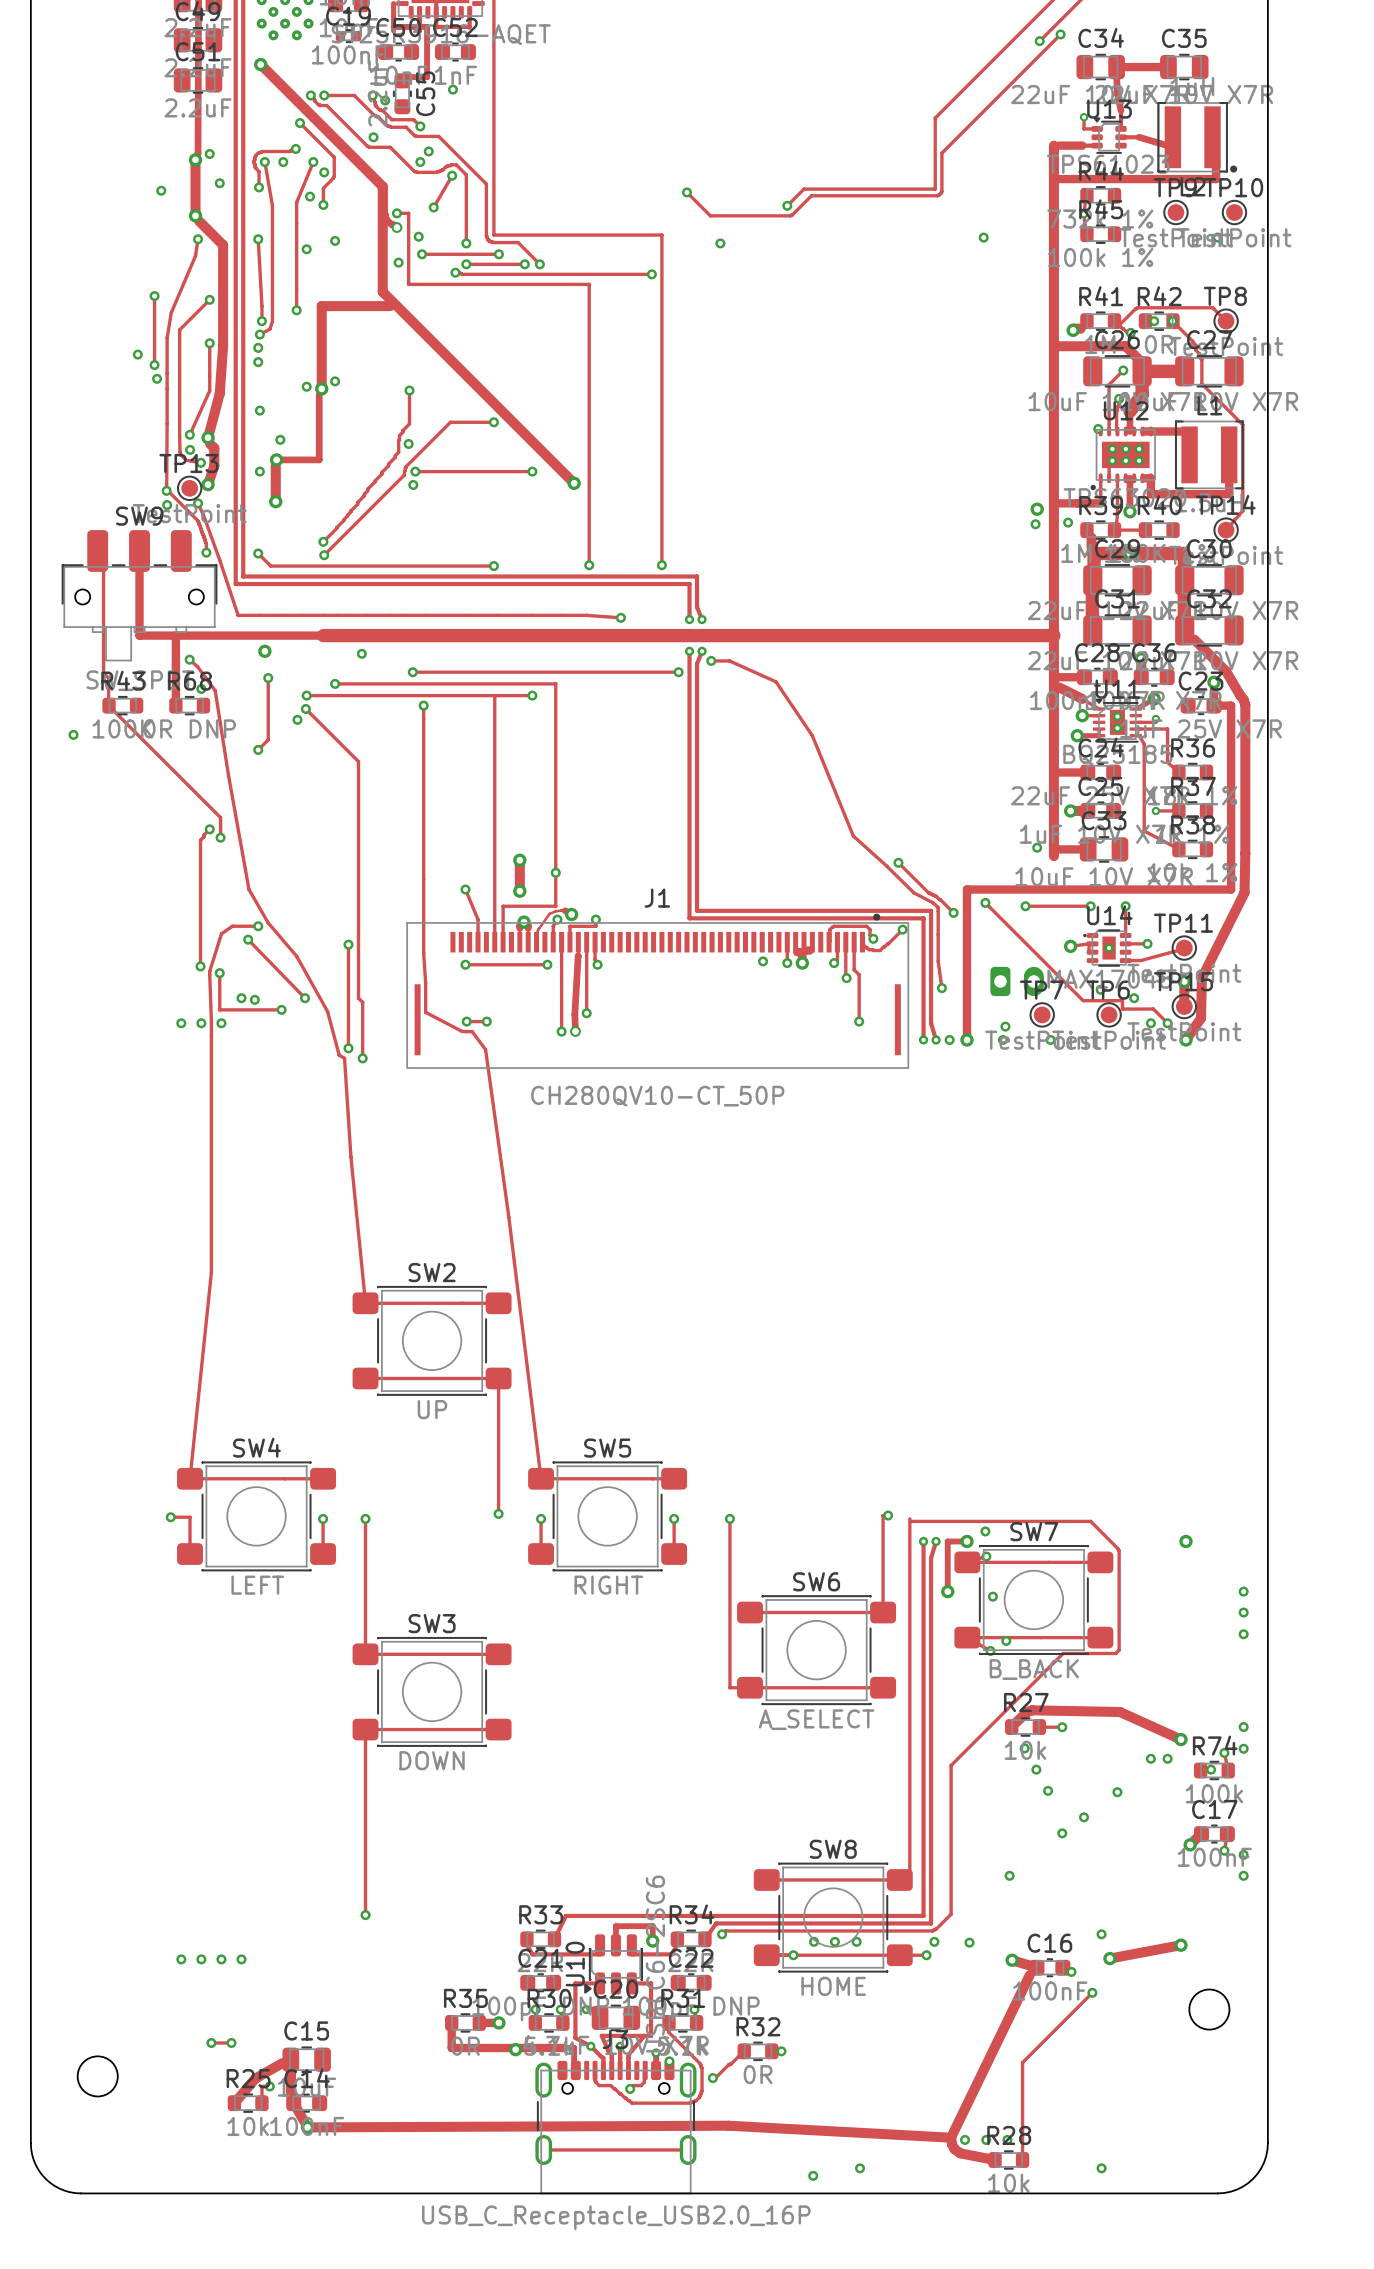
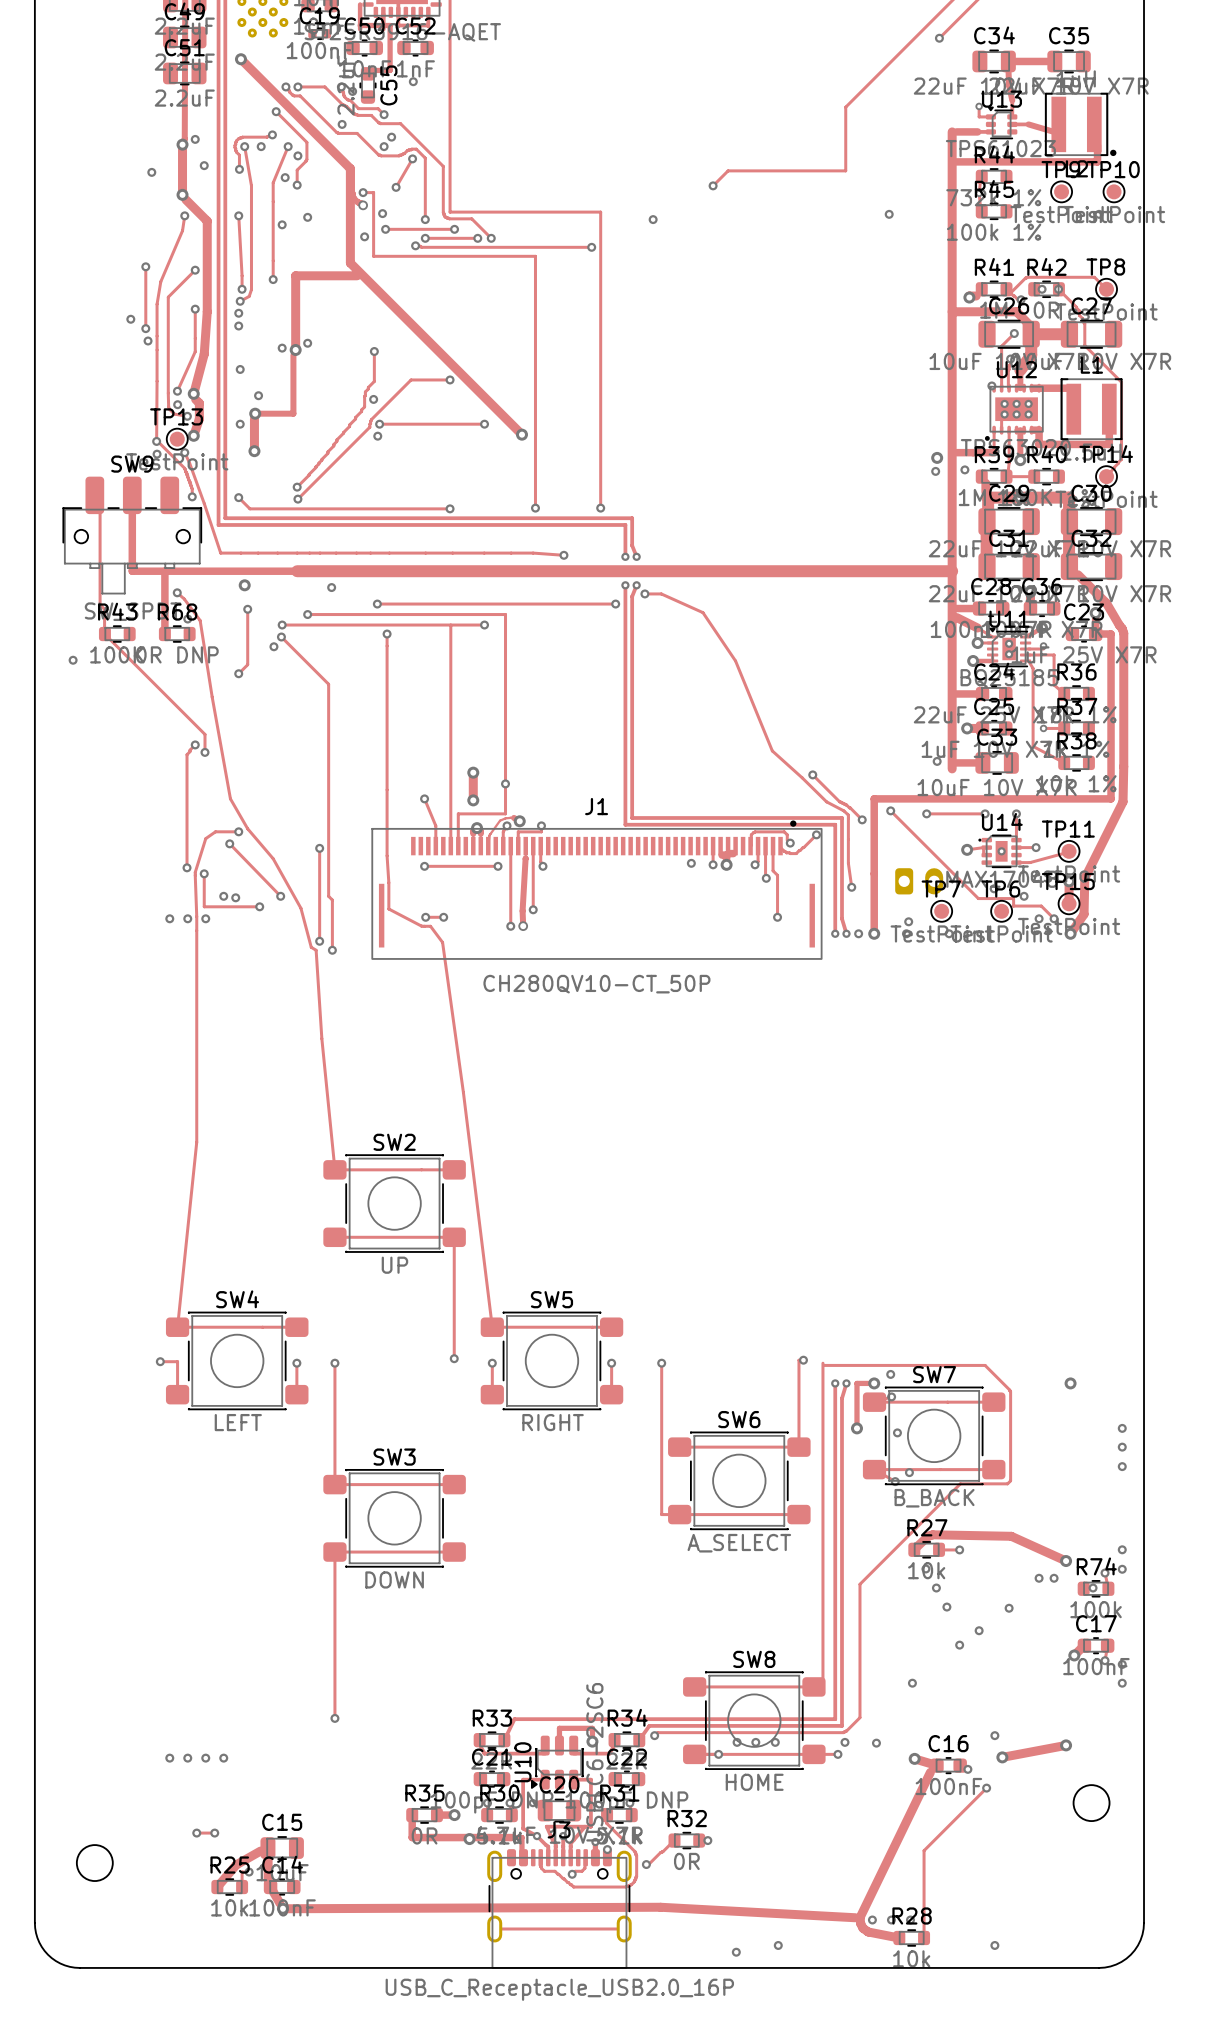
track: (1060, 34) (941, 153) (941, 191) (937, 195) (811, 195) (790, 215) (710, 215) (686, 192) -> none
via: (1060, 34) -> none
via: (686, 192) -> none

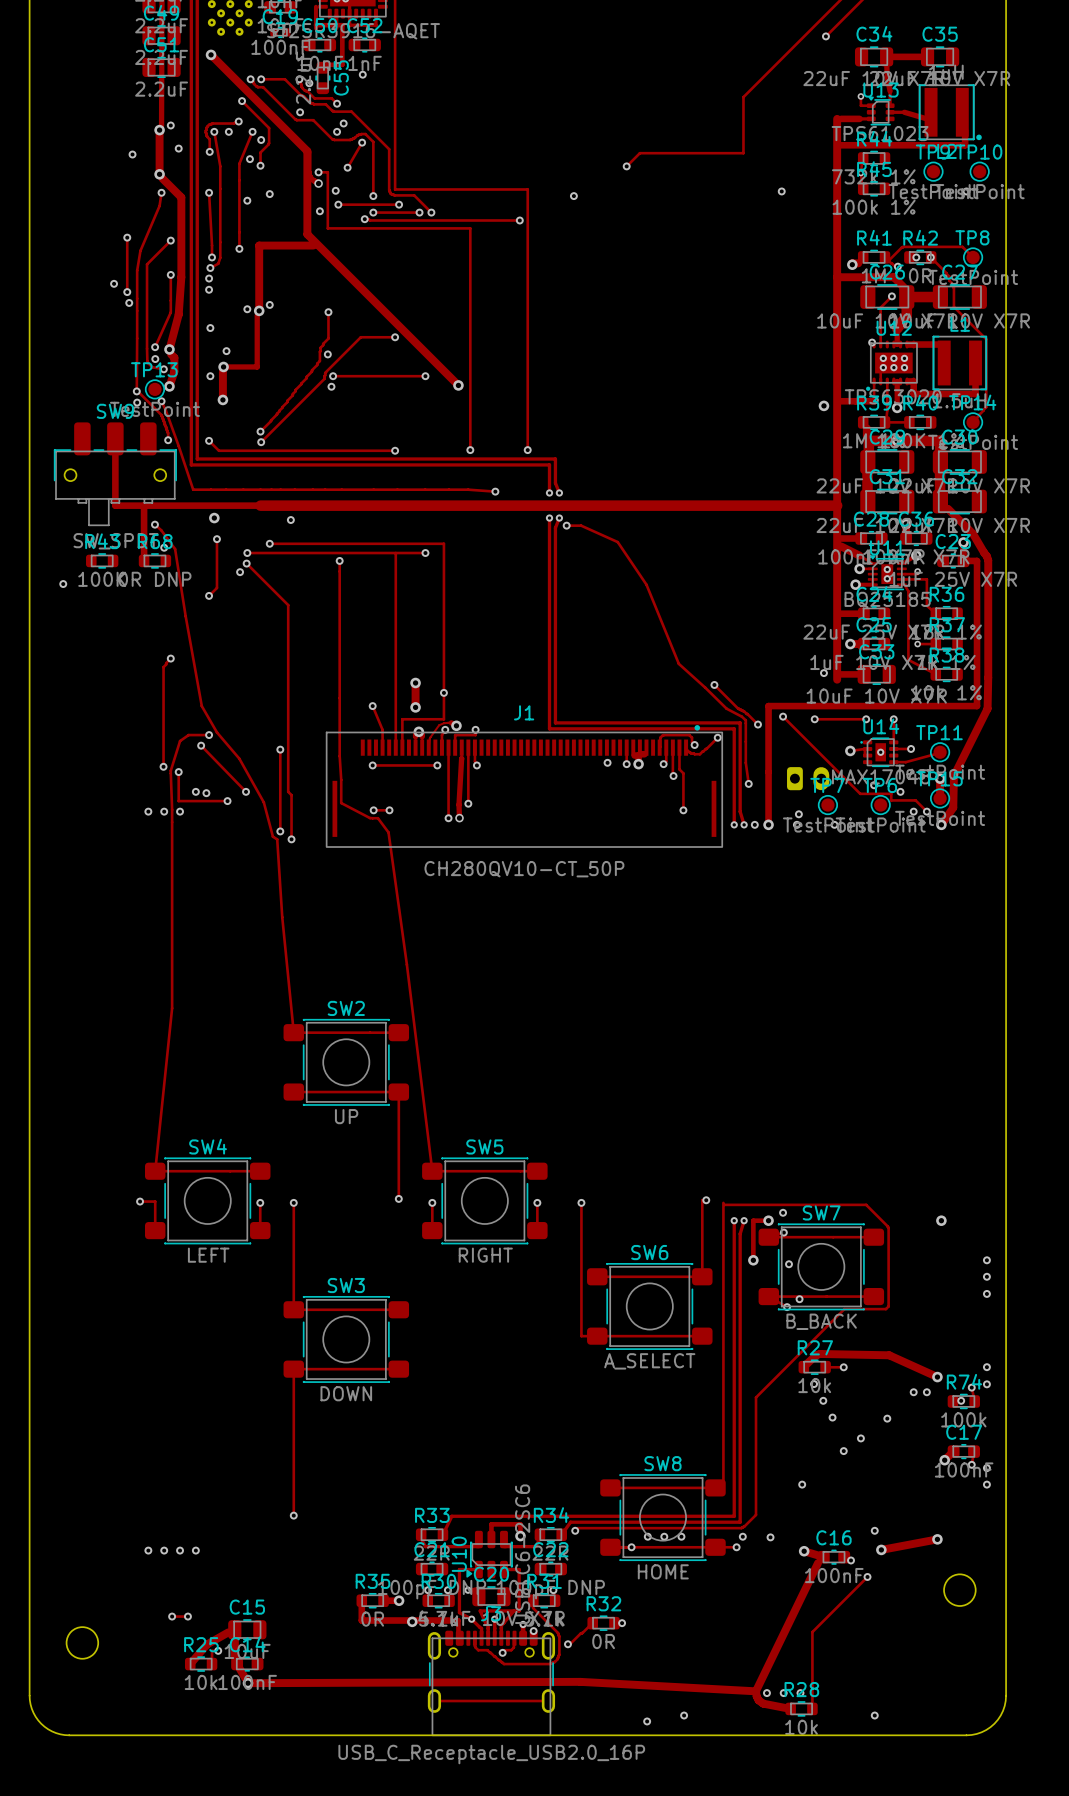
track: (1010, 358) (1008, 370) (1009, 388) -> none
via: (1010, 358) -> none
via: (964, 469) -> none
via: (935, 471) -> none
track: (94, 495) (100, 501) (100, 604) (104, 609) (104, 634) (204, 734) (204, 752) -> none
track: (377, 604) (615, 604) -> none
via: (377, 604) -> none
via: (615, 604) -> none
via: (204, 752) -> none

